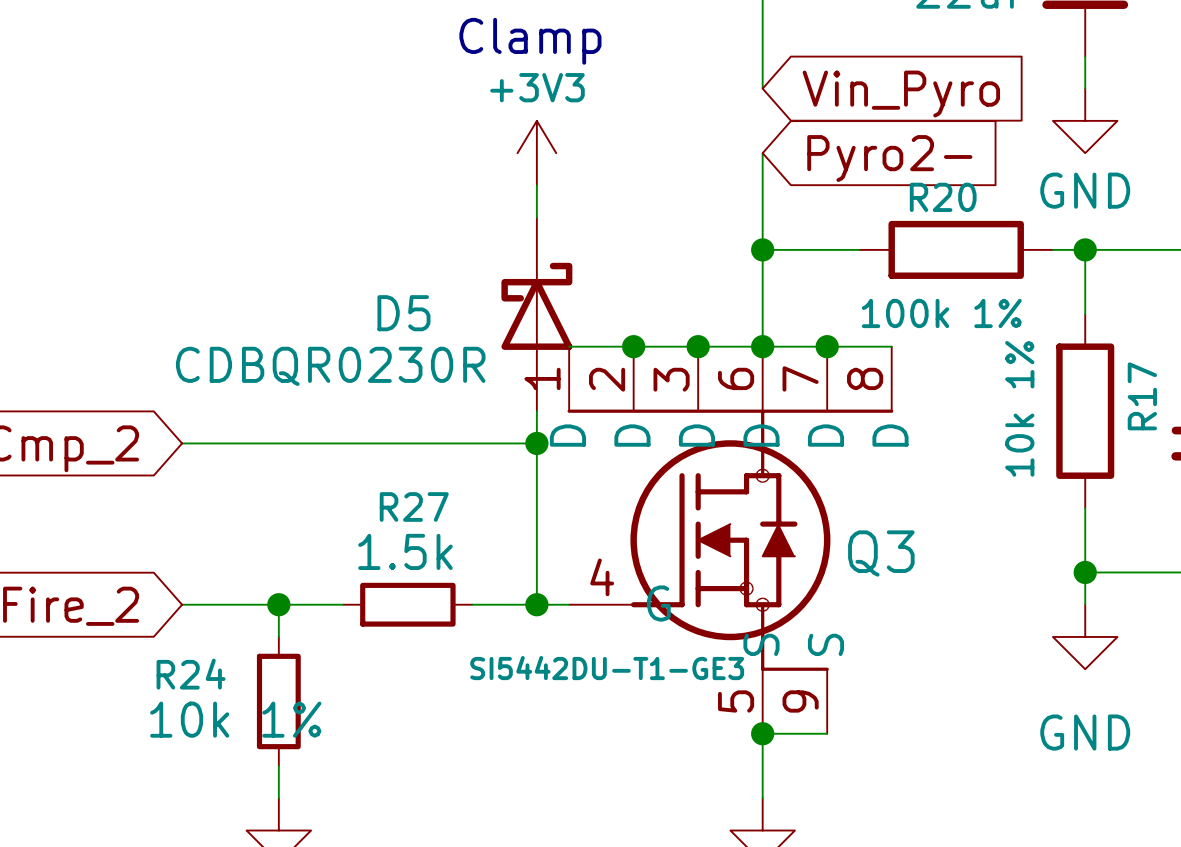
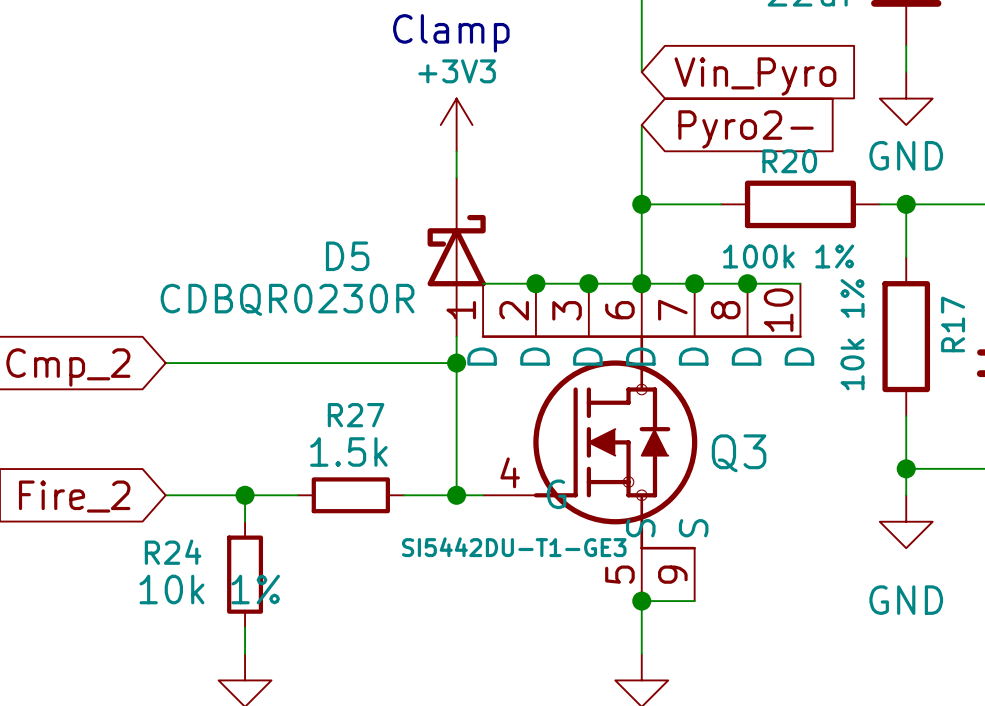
Q3 symbol: [567, 346, 894, 734] -> [481, 283, 802, 602]
wire: none -> (747, 283) (800, 283)
junction: none -> (747, 283)

